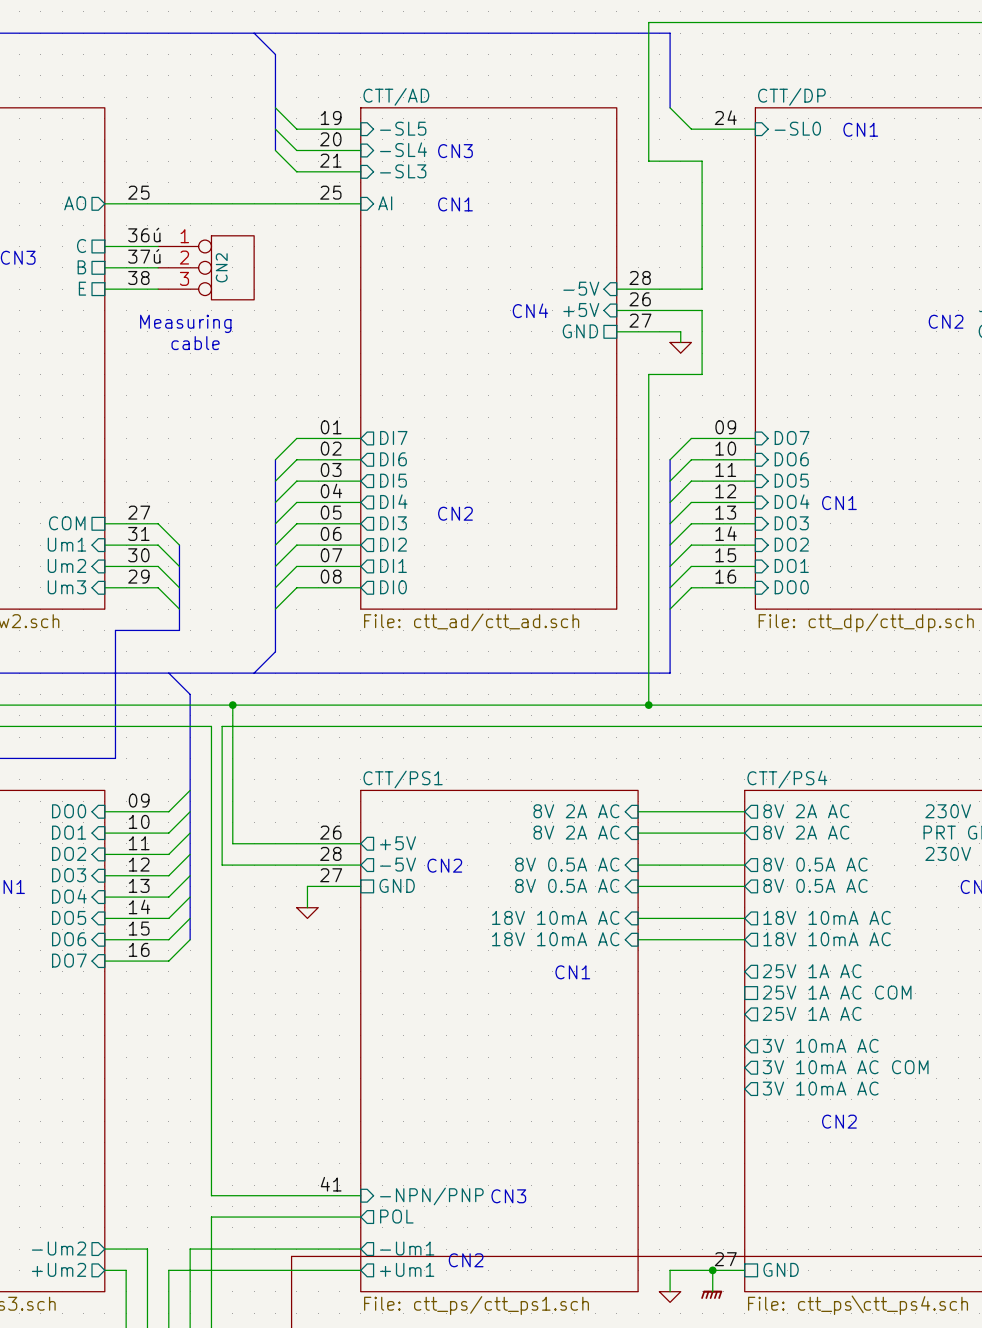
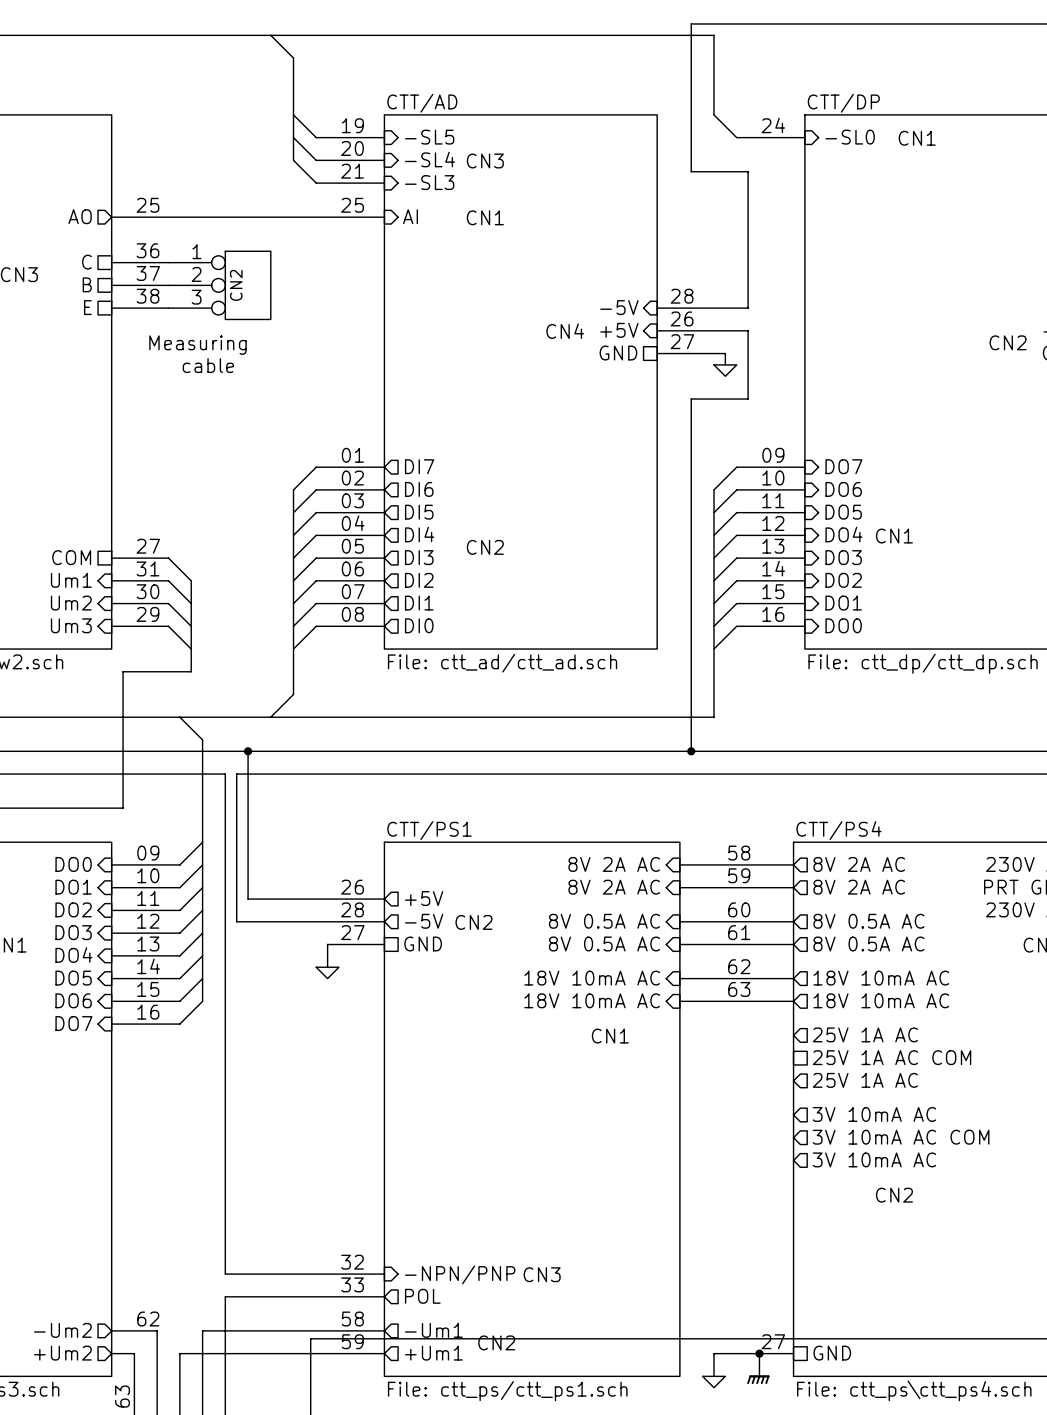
label: 36ú (144, 235) -> 36 (147, 250)
label: 37ú (144, 256) -> 37 (148, 273)
label: none -> 58 (739, 853)
label: none -> 59 (739, 875)
label: none -> 60 (739, 909)
label: none -> 61 (739, 932)
label: none -> 62 (739, 966)
label: none -> 63 (739, 989)
label: 41 (331, 1184) -> 32 (352, 1262)
label: none -> 33 (352, 1284)
label: none -> 62 (148, 1319)
label: none -> 58 (352, 1319)
label: none -> 59 (352, 1341)
label: none -> 63 (122, 1396)

